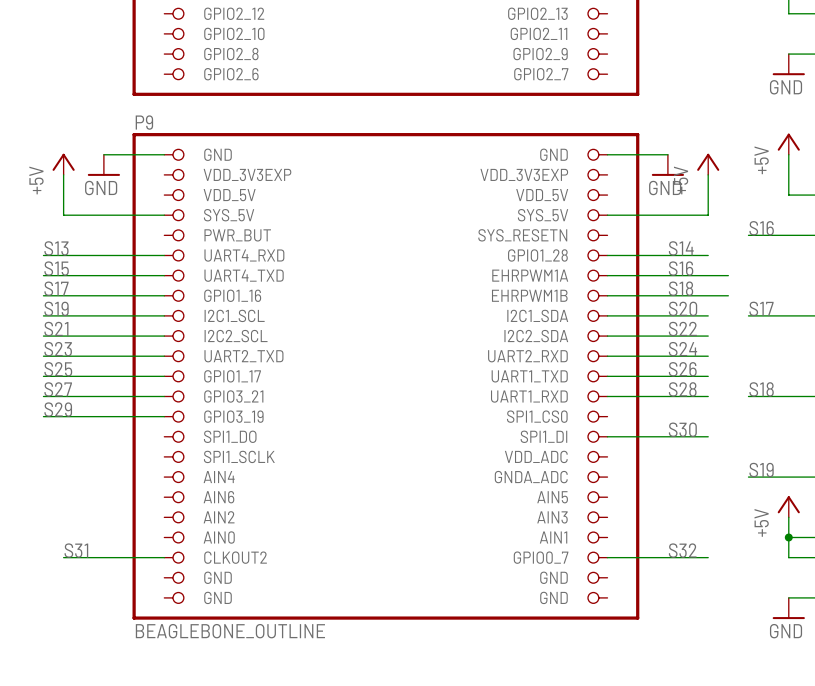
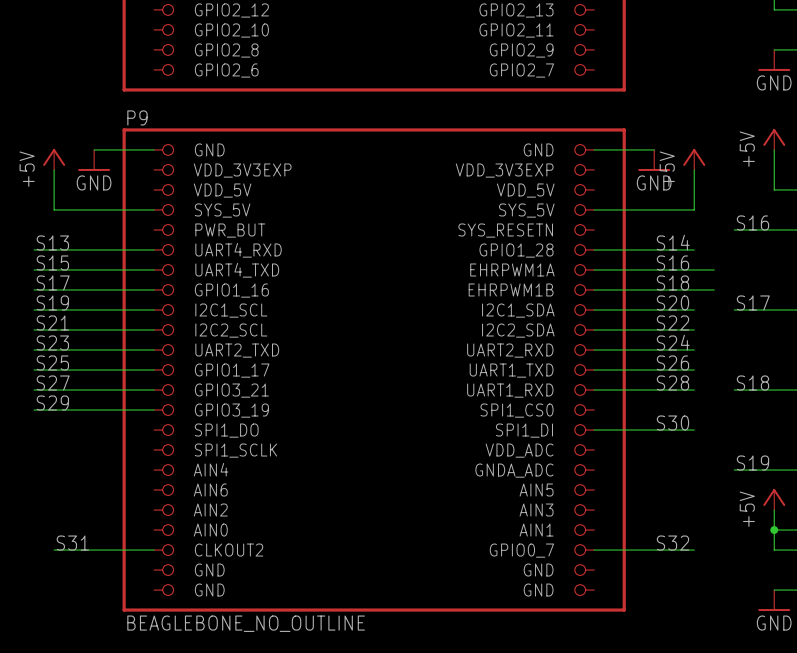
part value: BEAGLEBONE_OUTLINE (230, 631) -> BEAGLEBONE_NO_OUTLINE (246, 623)

